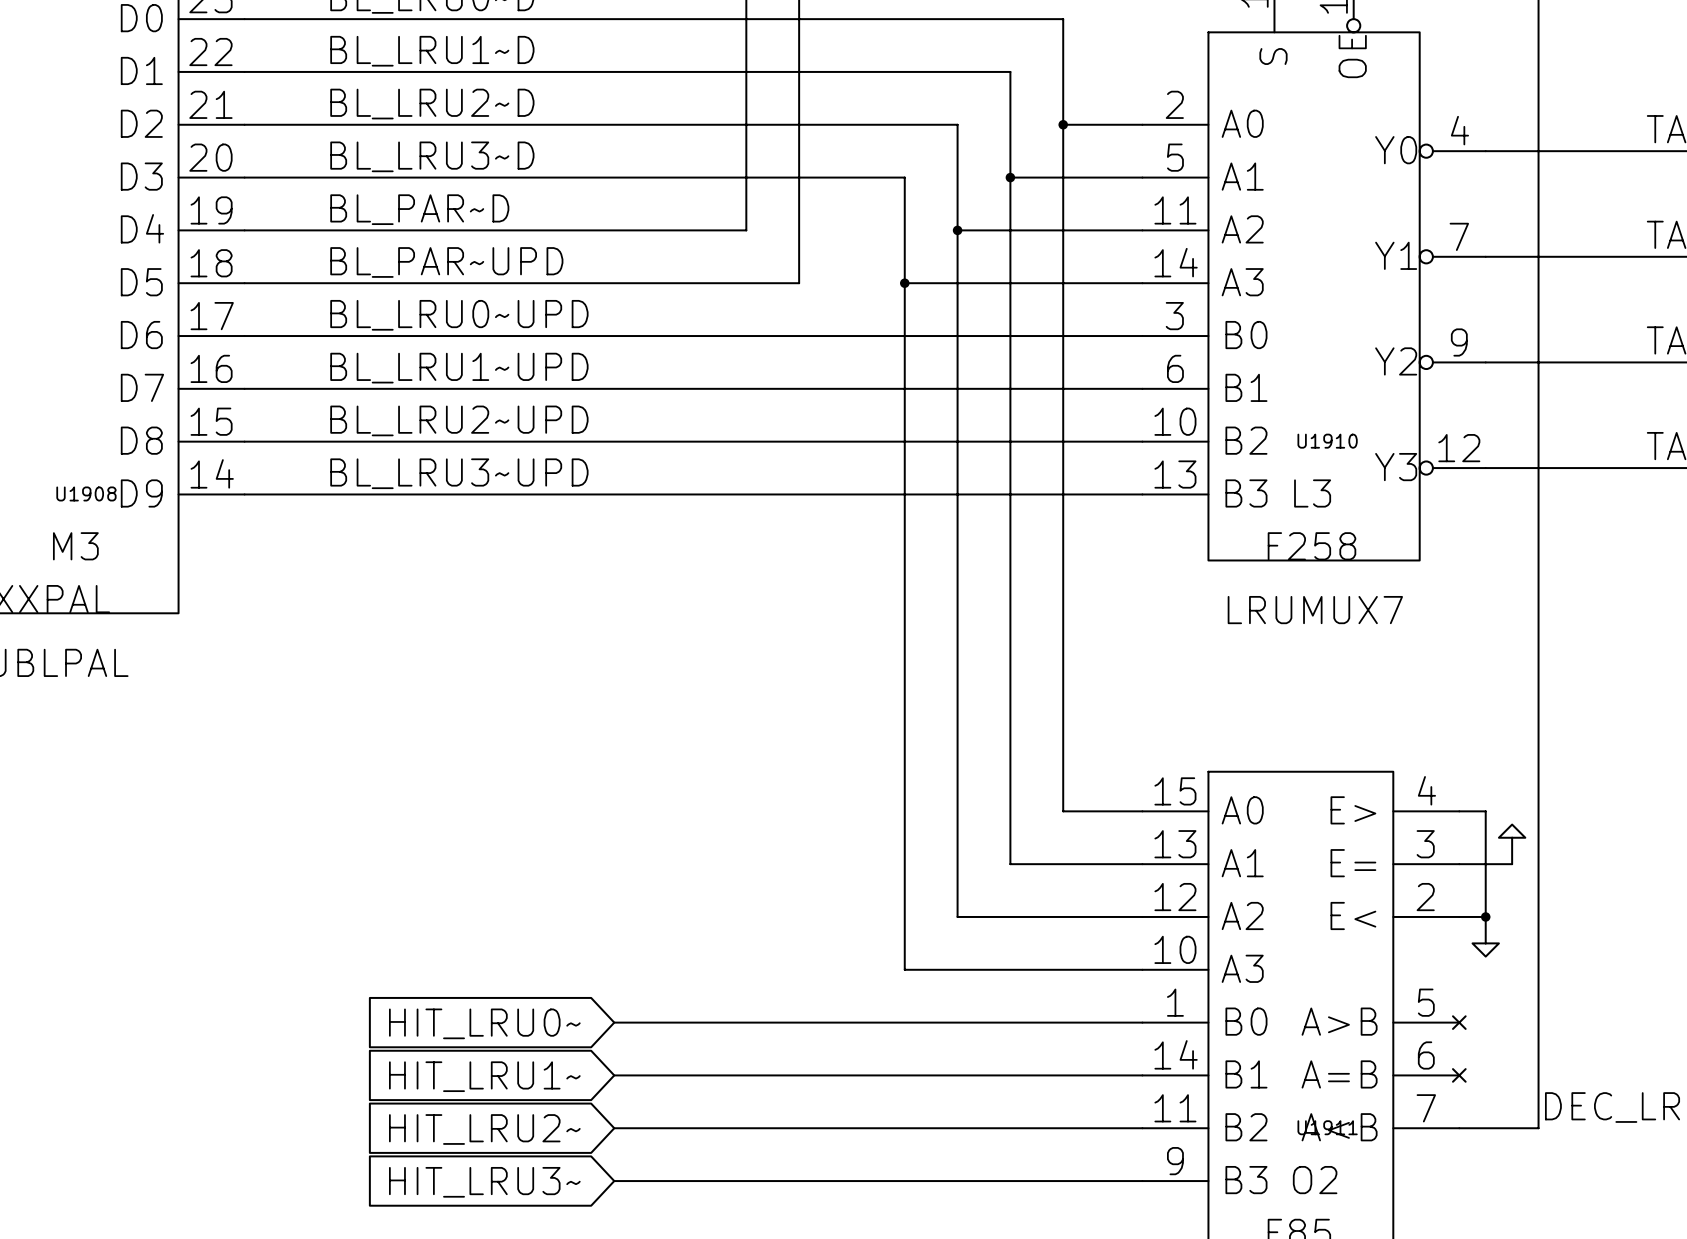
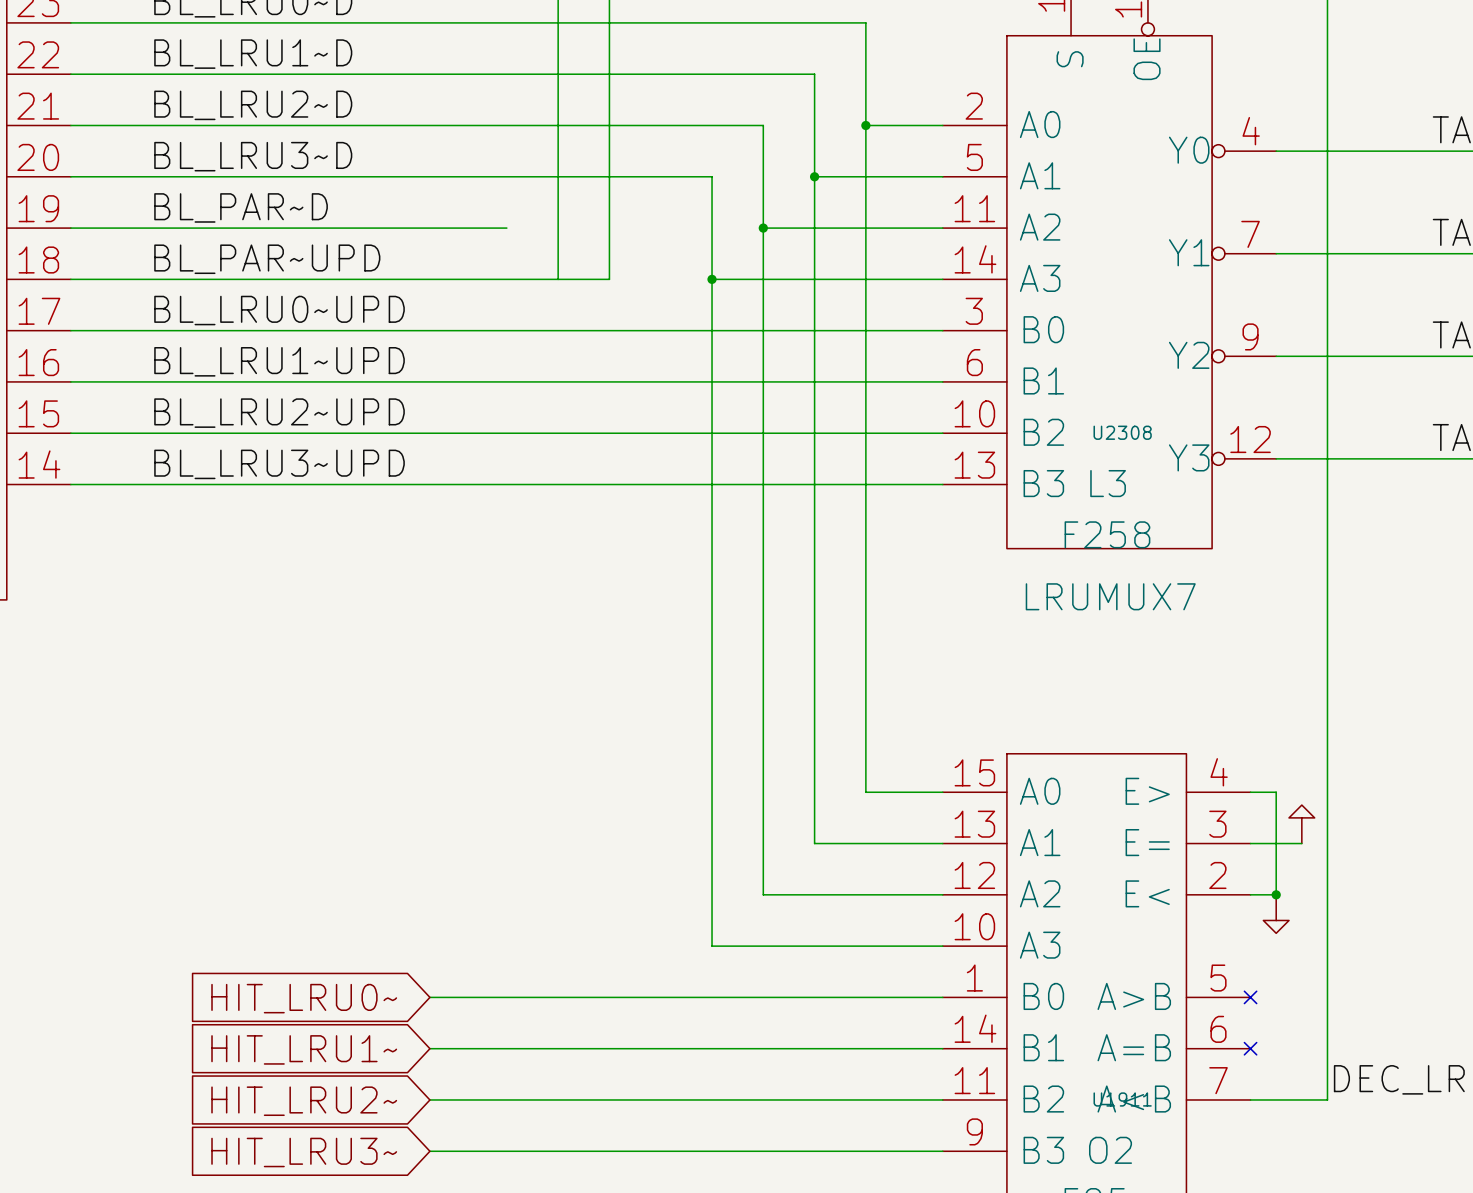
wire: (693, 230) (746, 230) -> (558, 279) (558, 228)
U1910 name: U1910 (1327, 441) -> U2308 (1122, 432)

